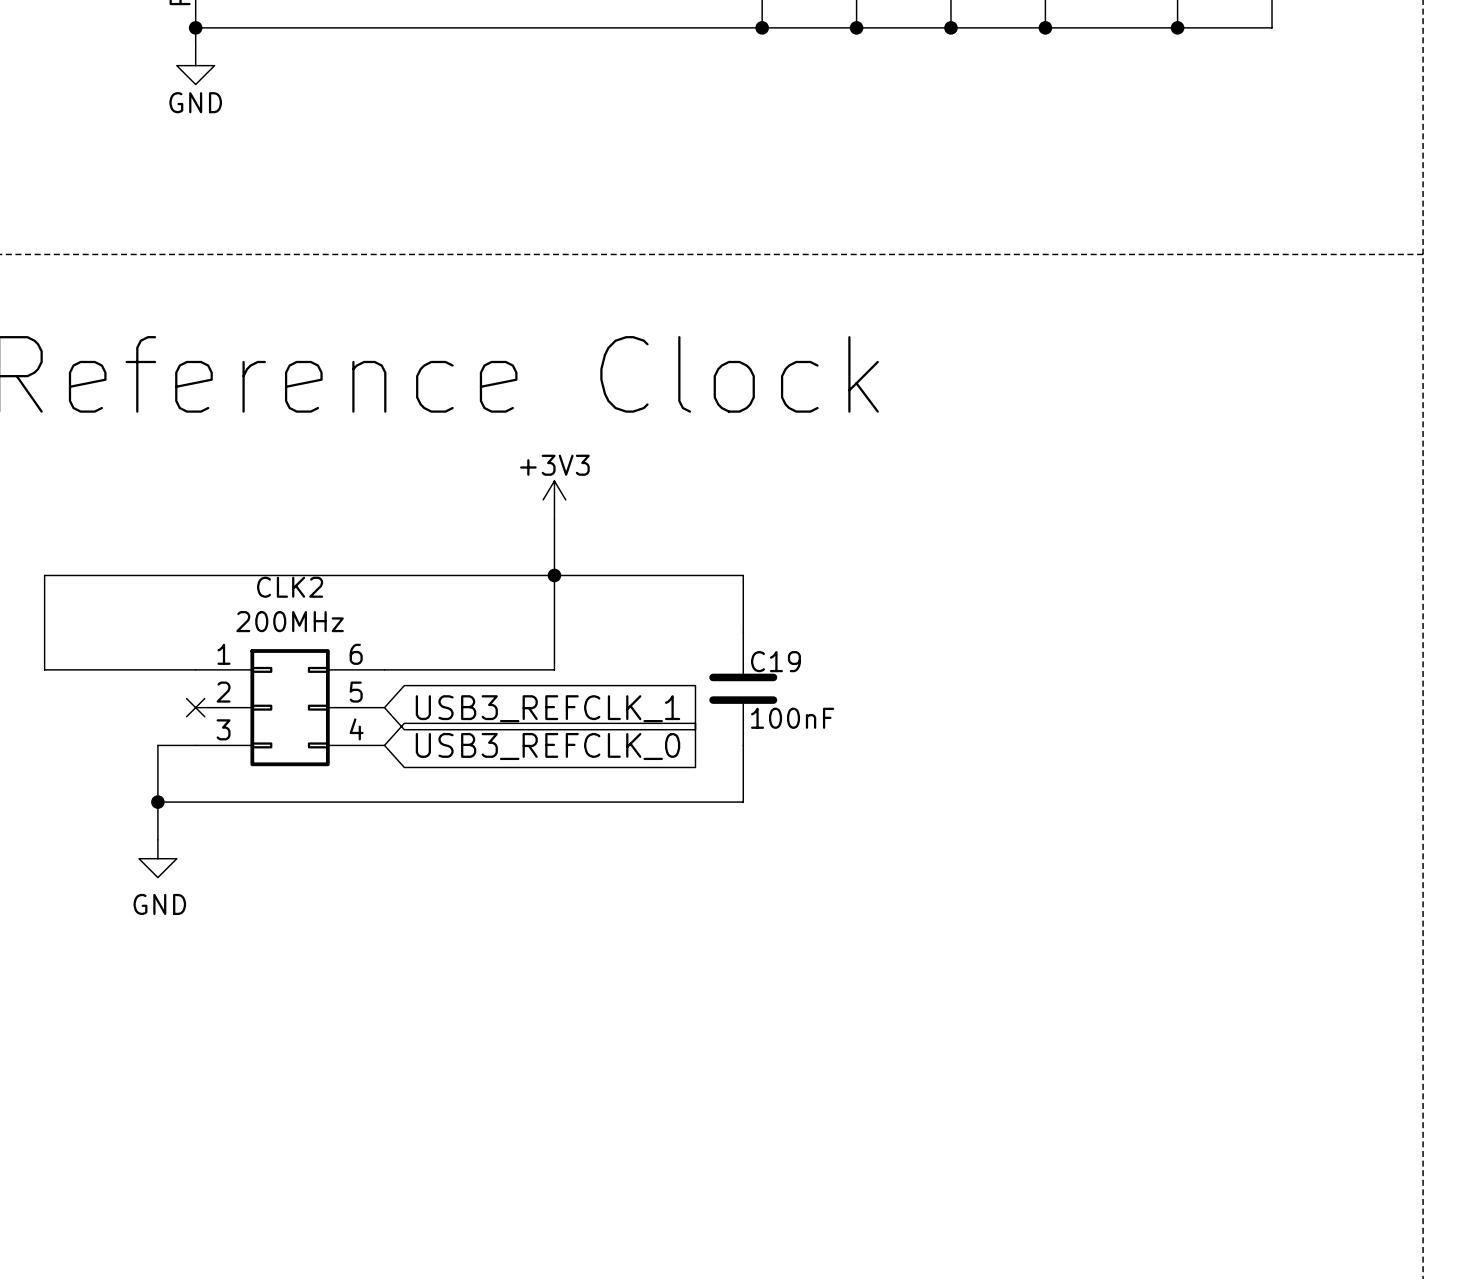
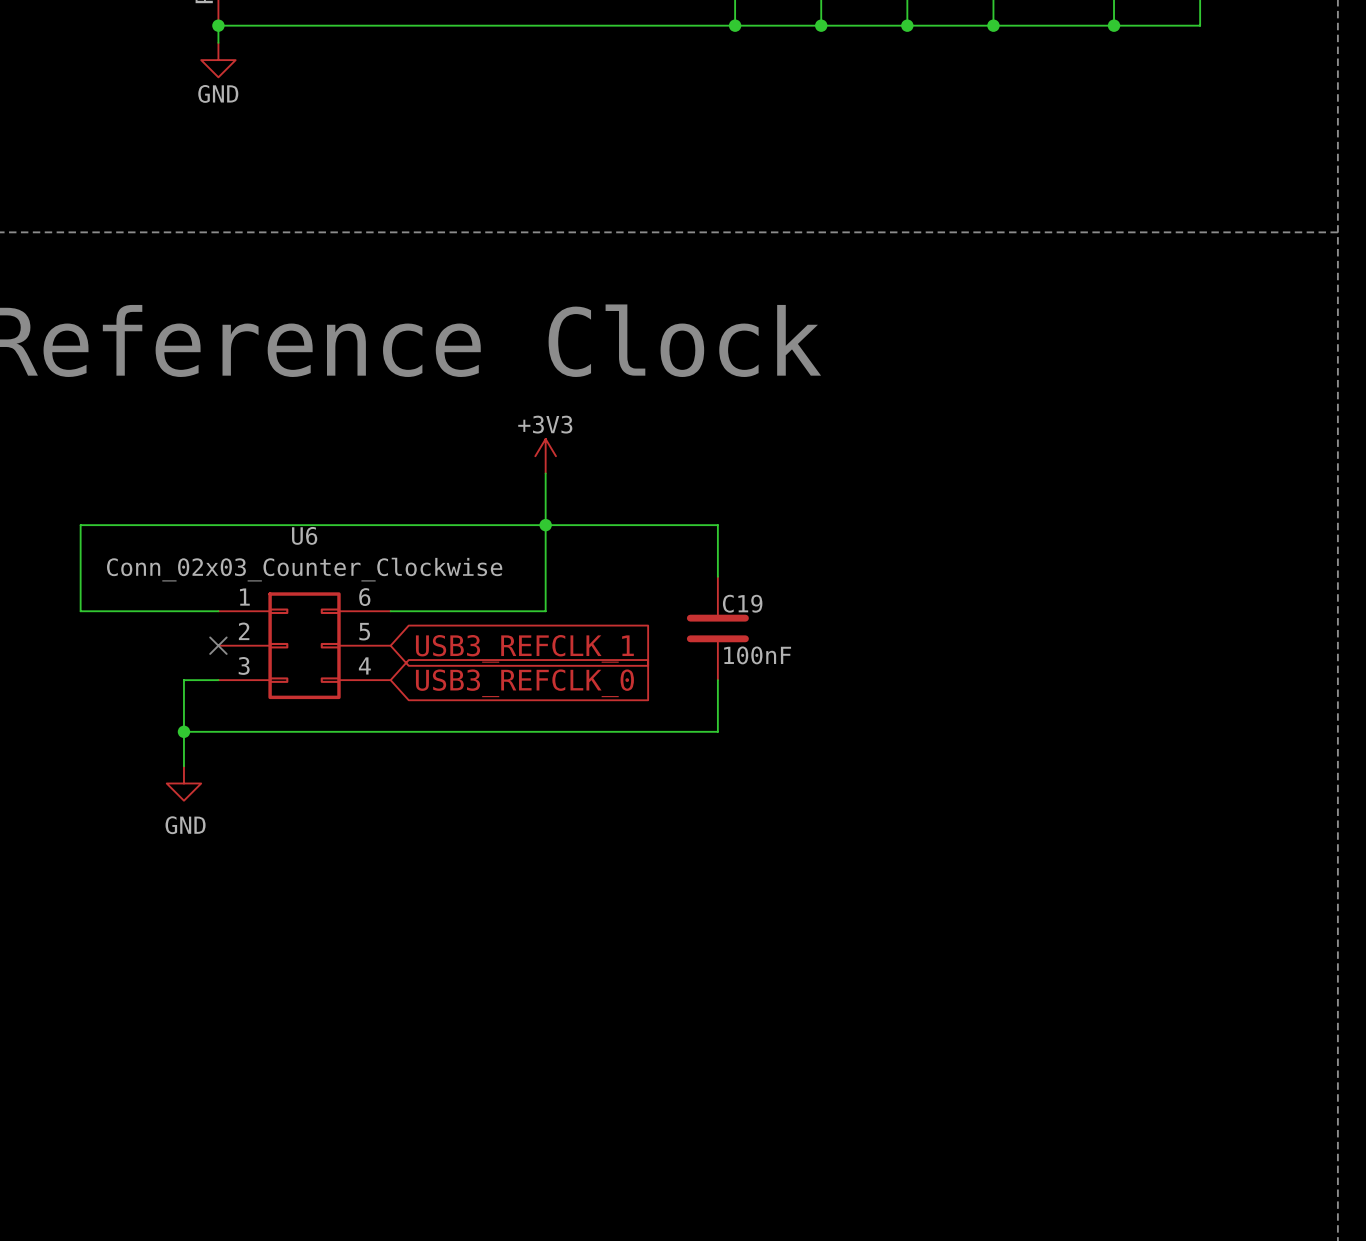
CLK2 name: CLK2 (290, 587) -> U6 (304, 535)
CLK2 value: 200MHz (290, 621) -> Conn_02x03_Counter_Clockwise (304, 569)

